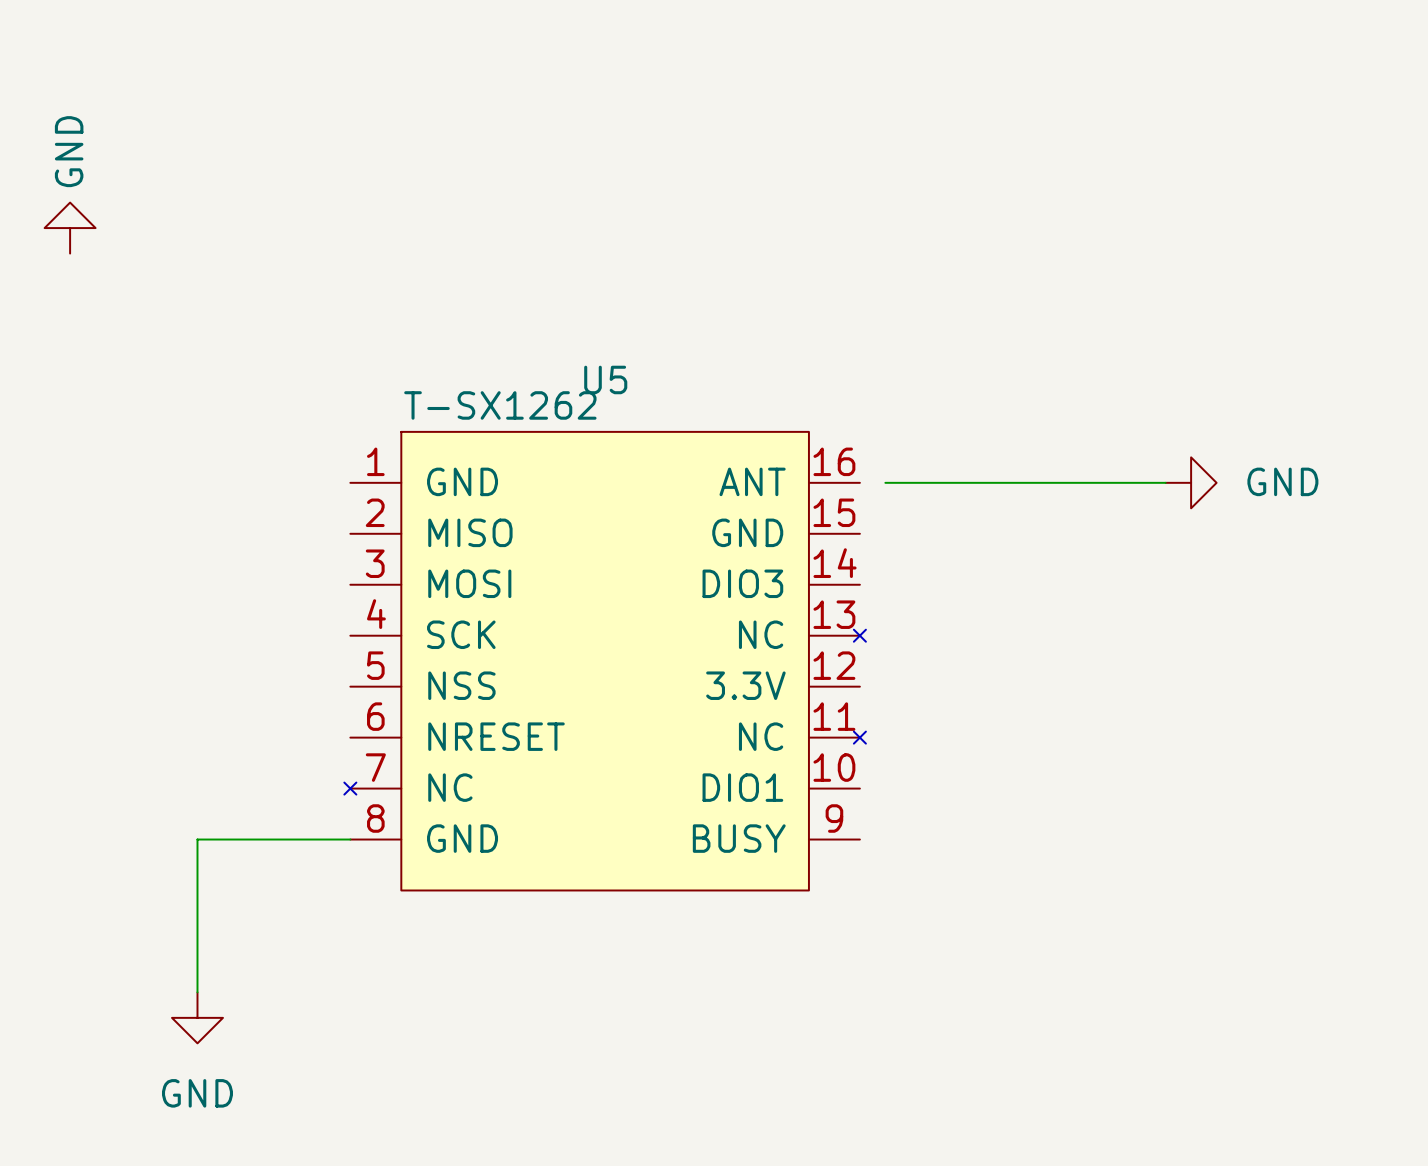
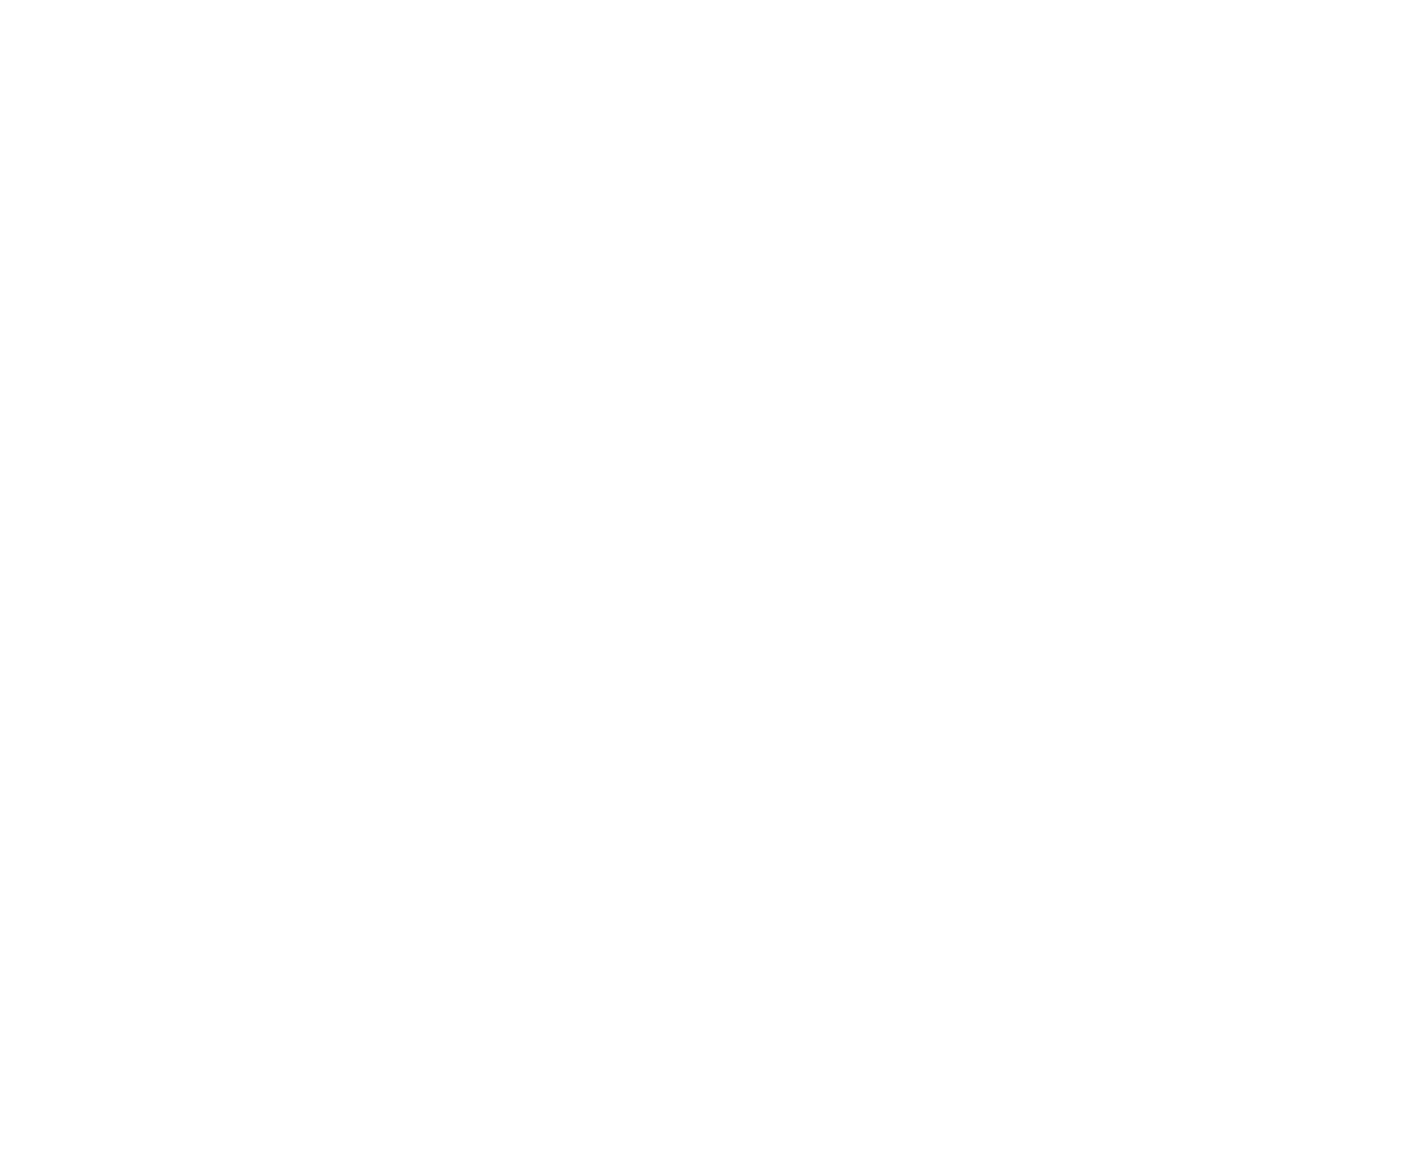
power symbol: GND (70, 228) -> none
wire: (885, 482) (1165, 482) -> none
power symbol: GND (1191, 482) -> none
U5: T-SX1262 (605, 661) -> none
wire: (350, 839) (197, 839) (197, 992) -> none
power symbol: GND (197, 1017) -> none

